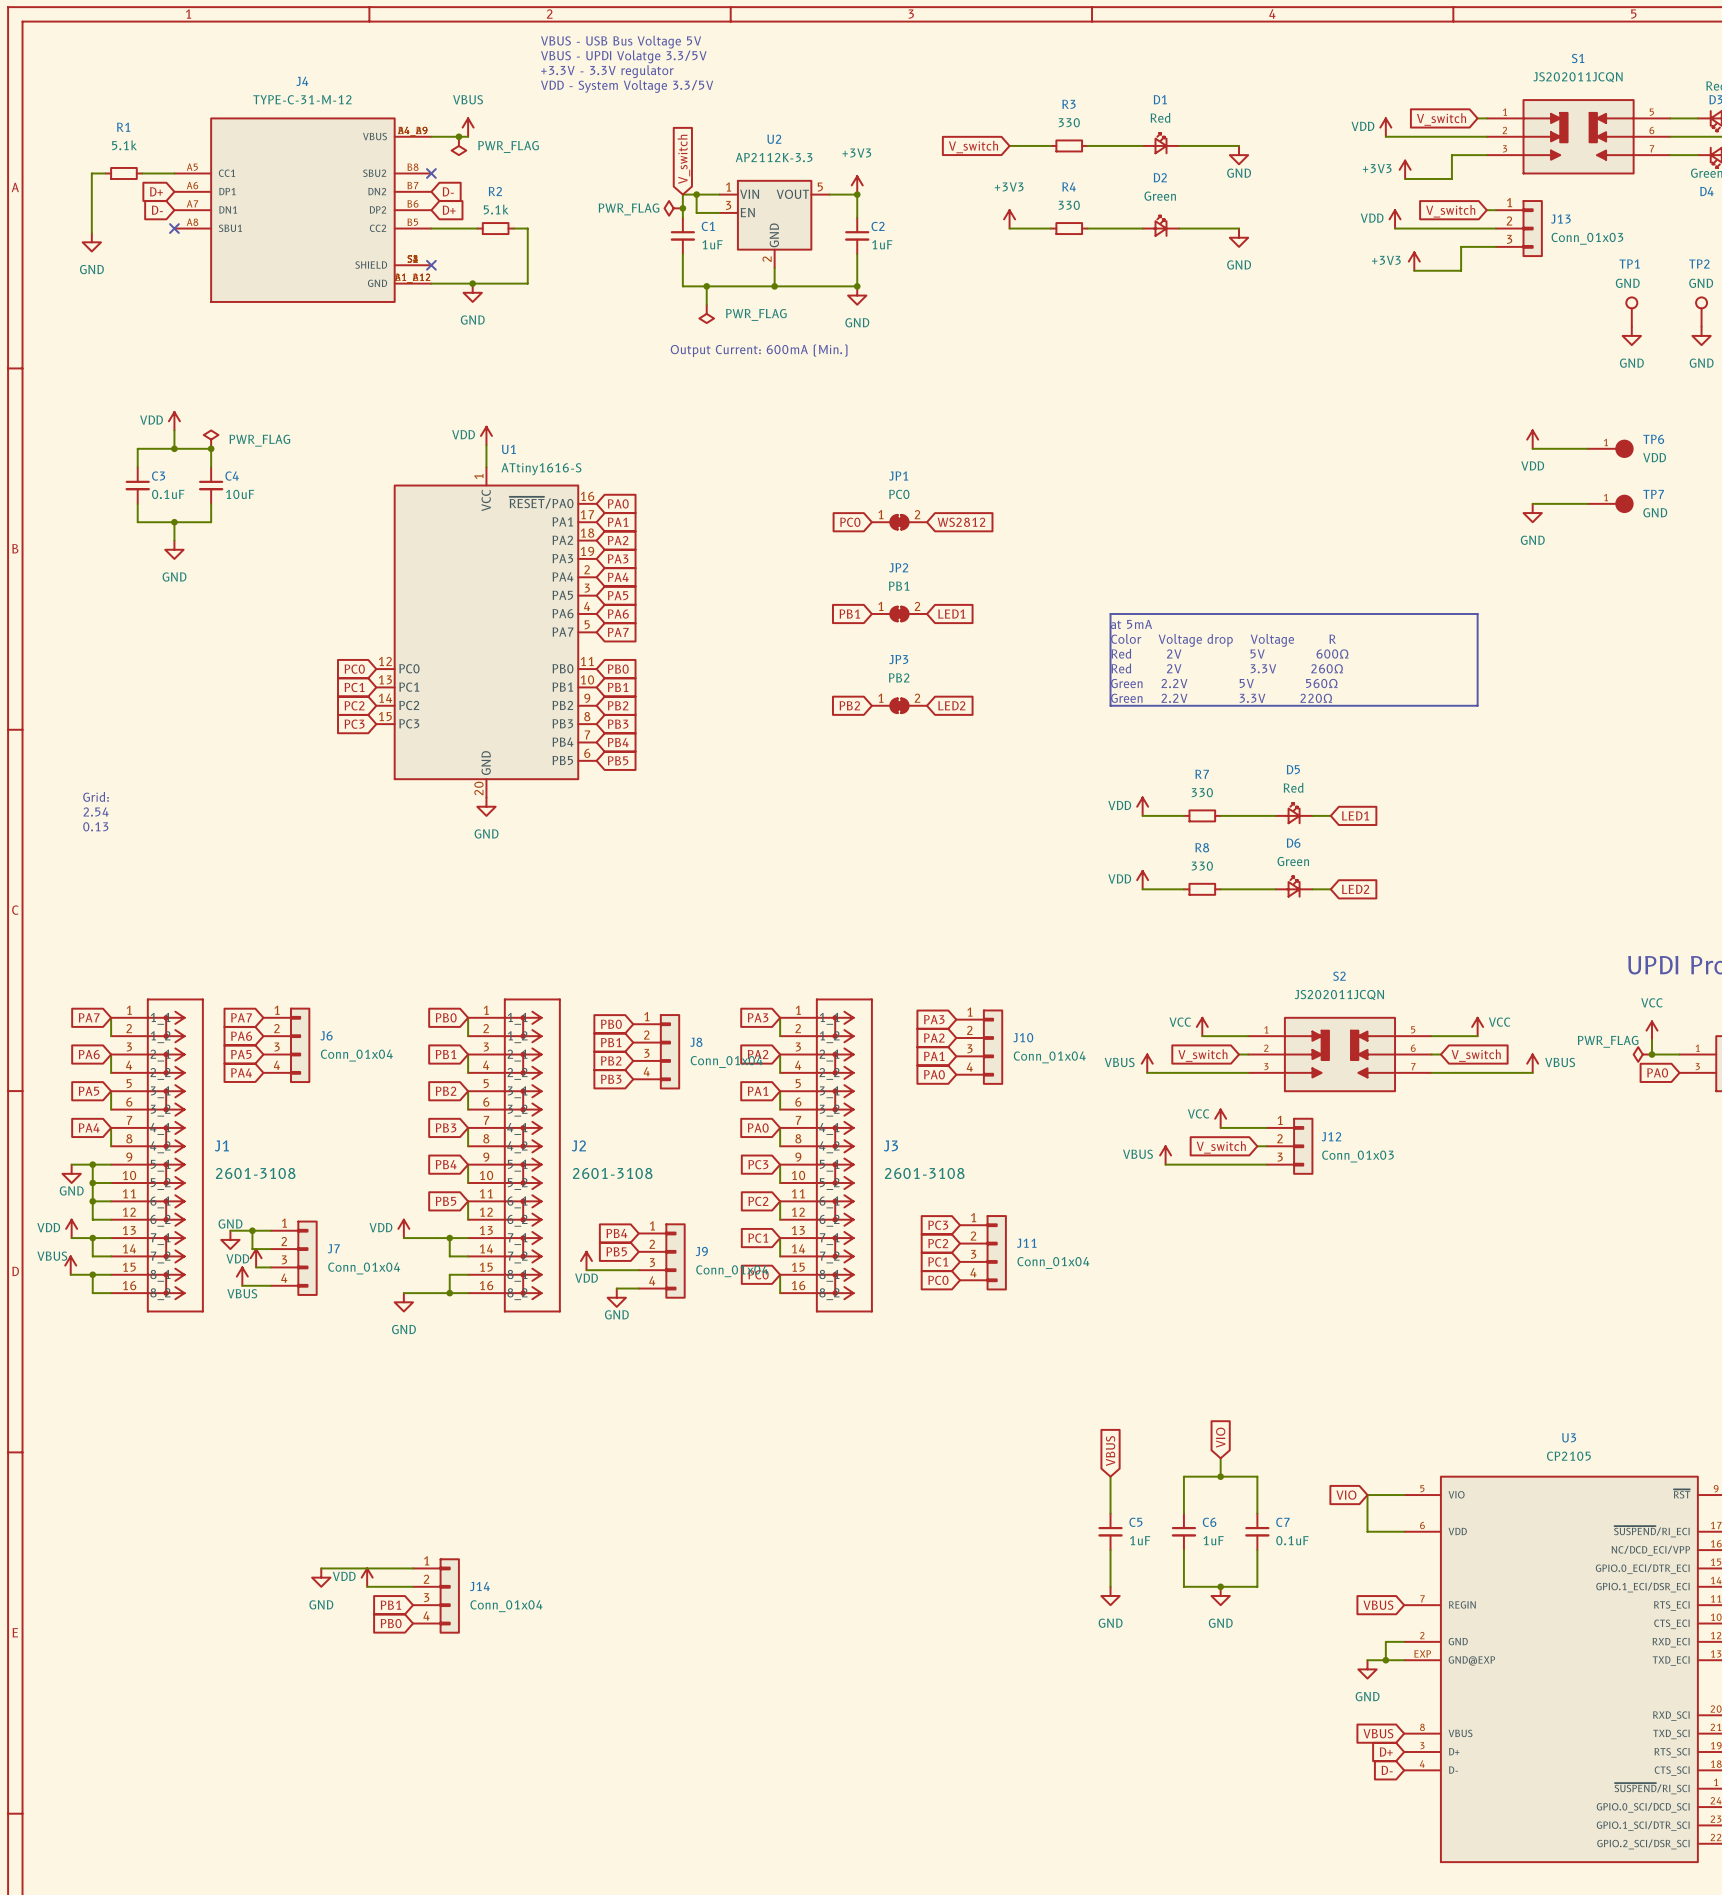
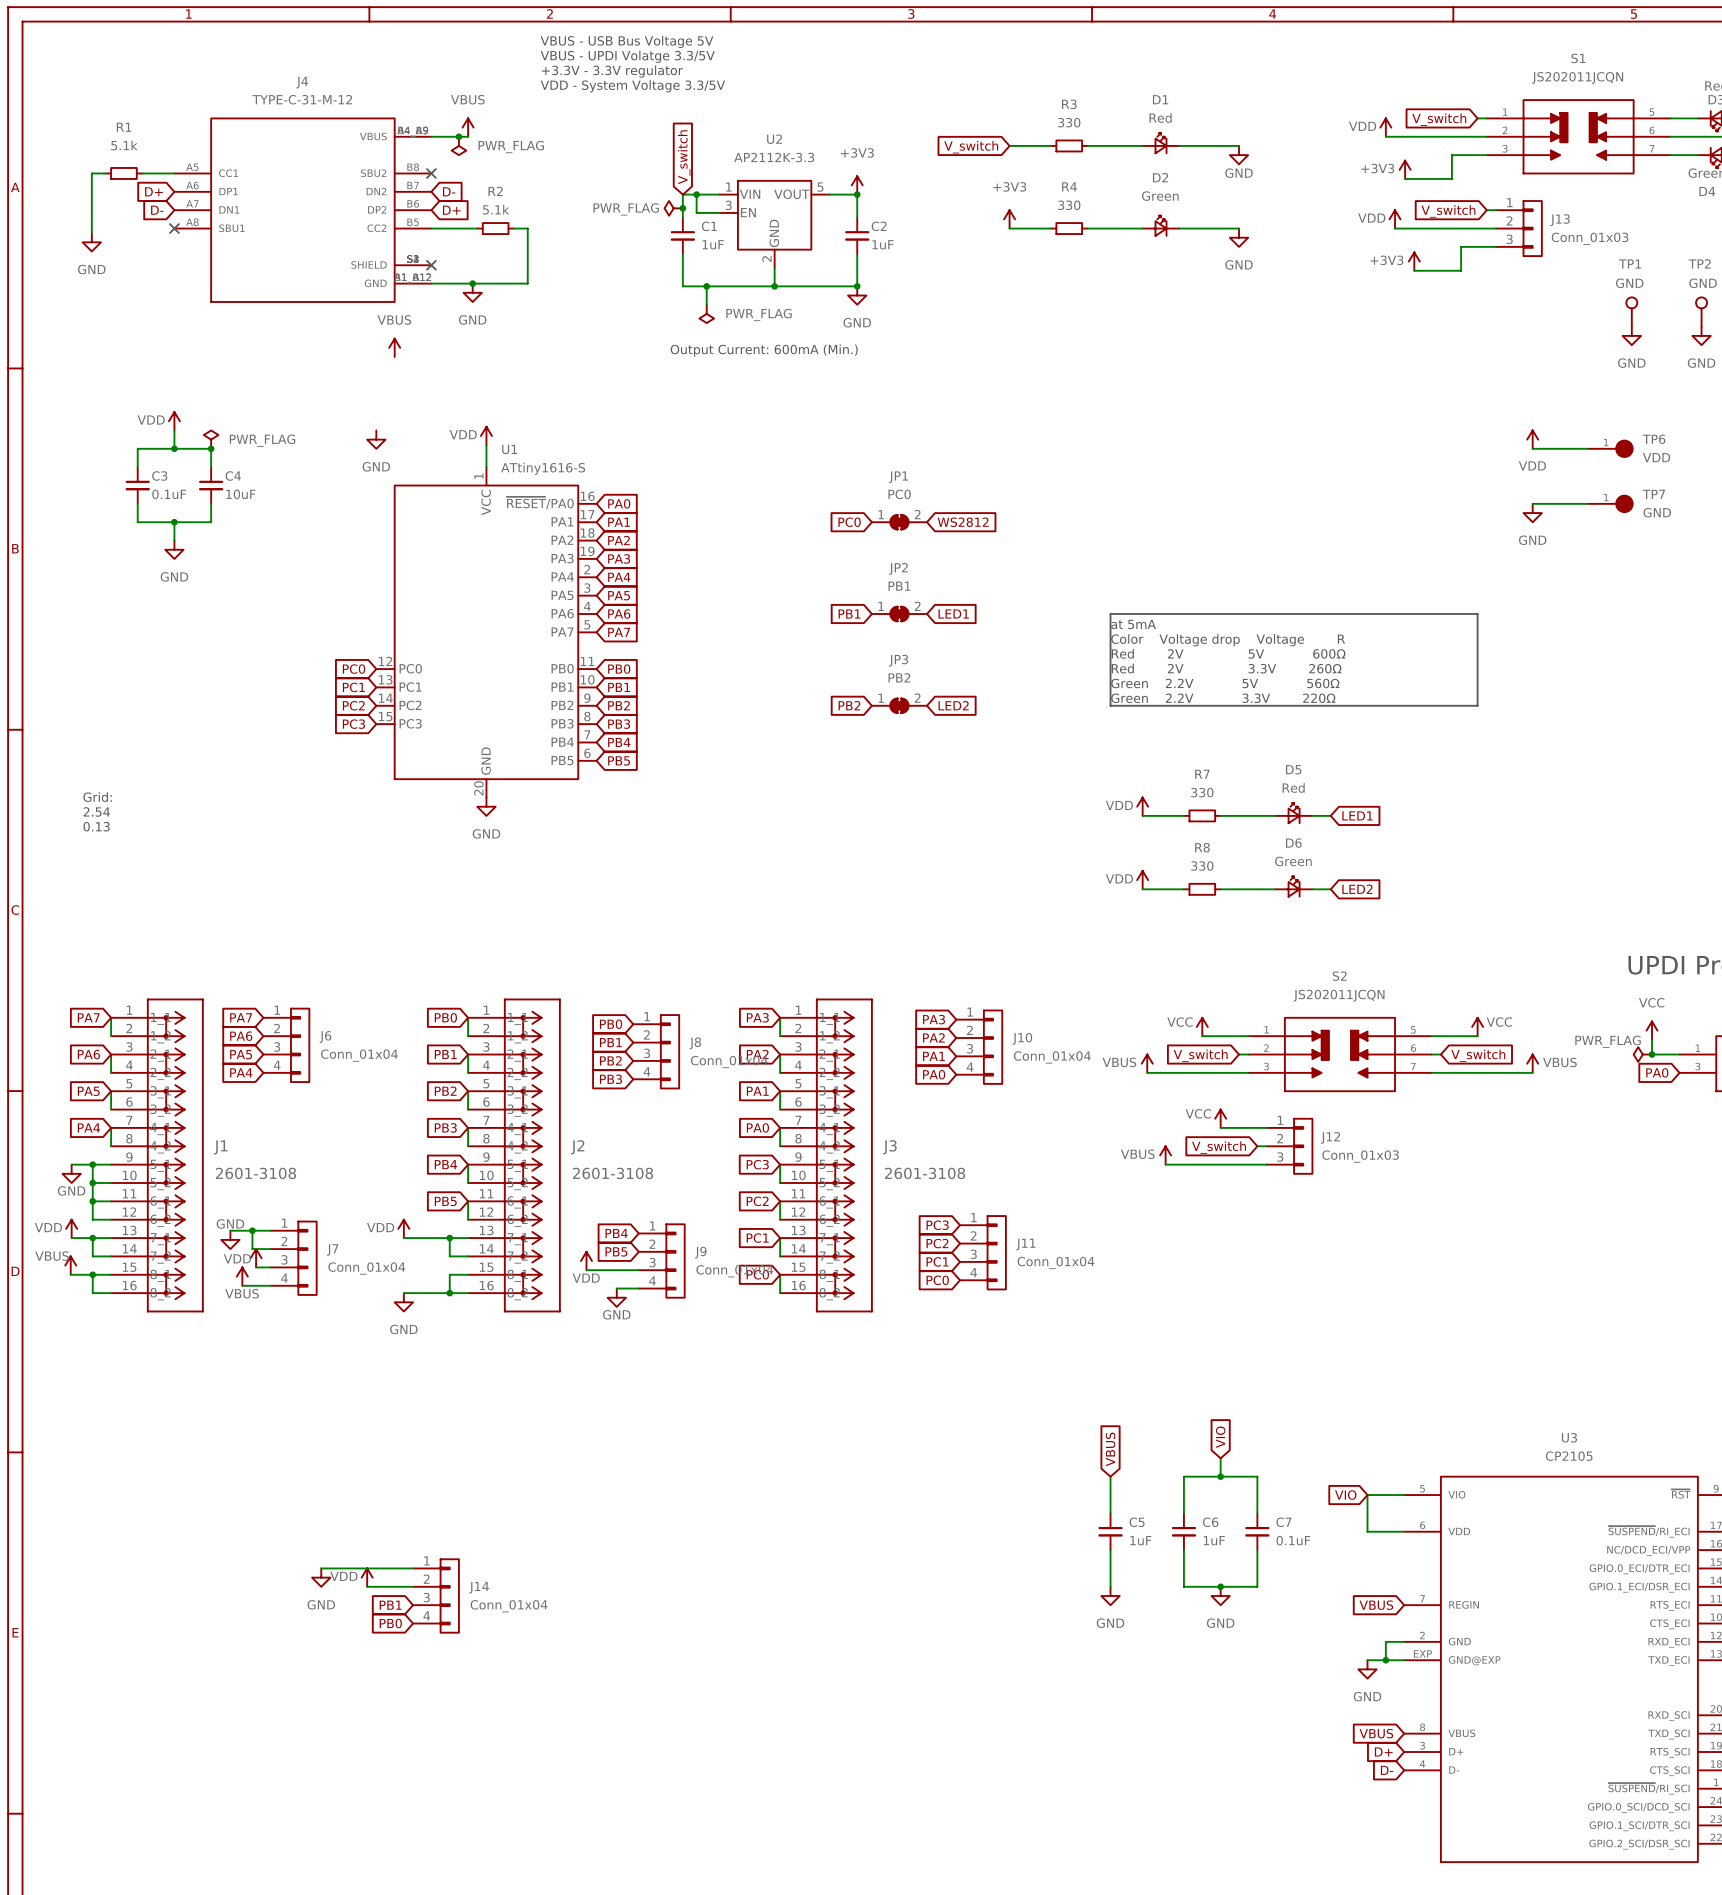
power symbol: none -> VBUS (394, 347)
power symbol: none -> GND (376, 439)

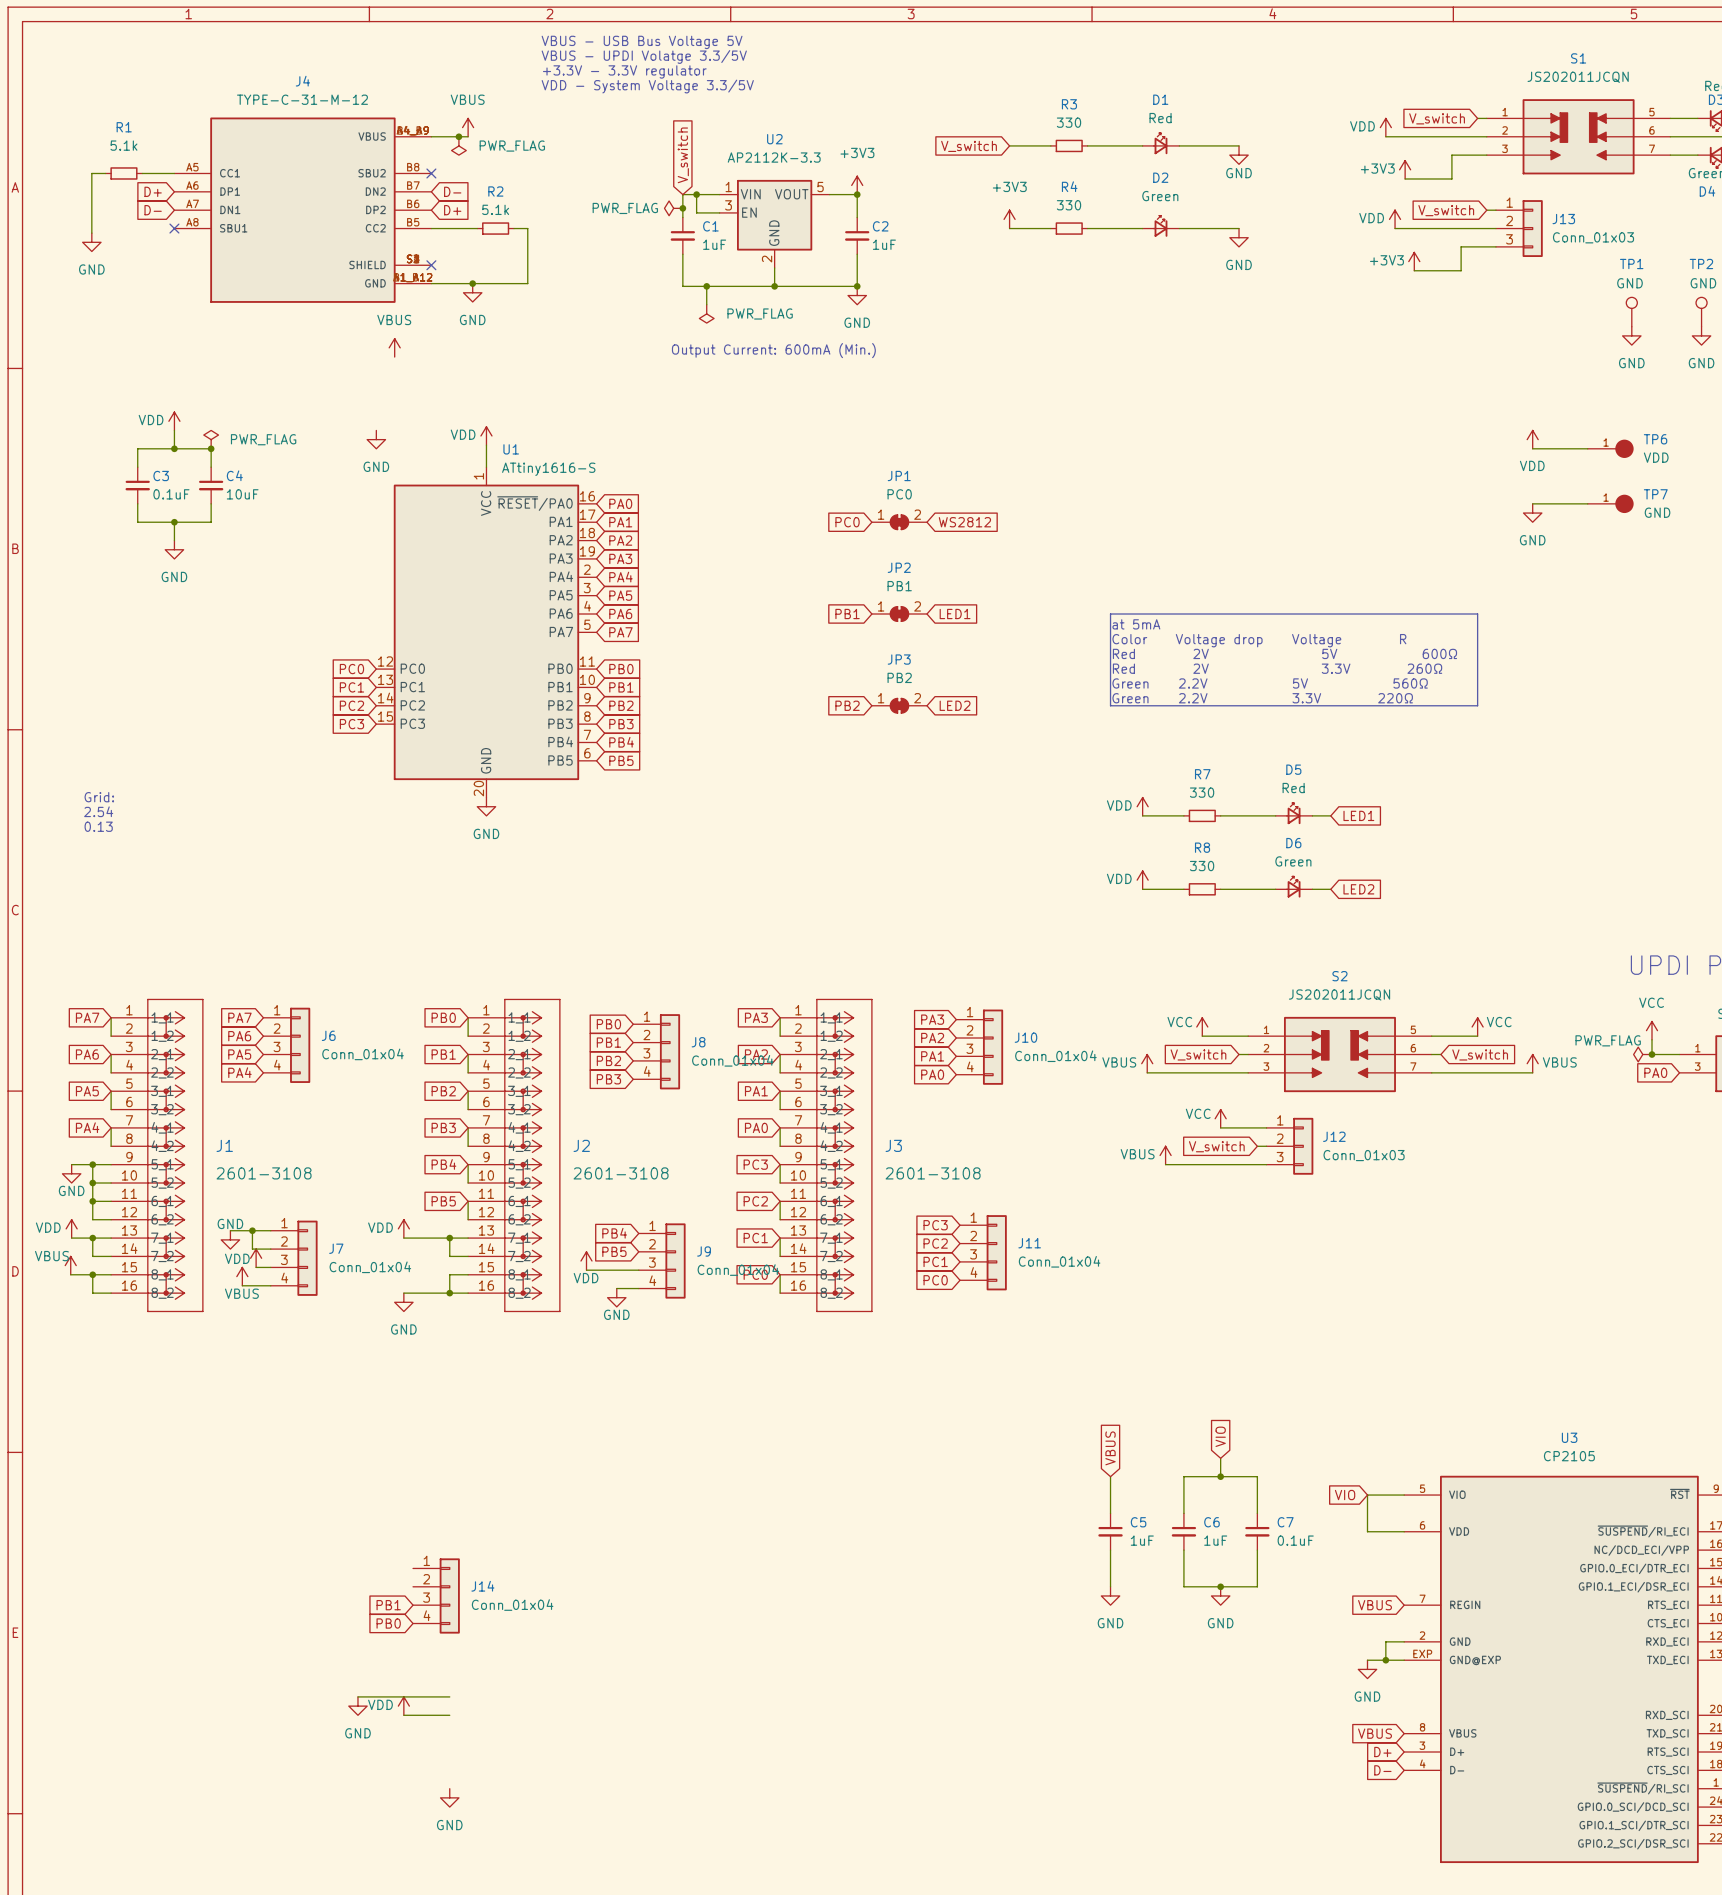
wire: (321, 1568) (413, 1568) -> (357, 1696) (449, 1696)
power symbol: GND (321, 1577) -> none
power symbol position: VDD (367, 1577) -> VDD (403, 1706)
wire: (367, 1586) (413, 1586) -> (403, 1715) (449, 1715)
power symbol: none -> GND (357, 1706)
power symbol: none -> GND (449, 1797)

